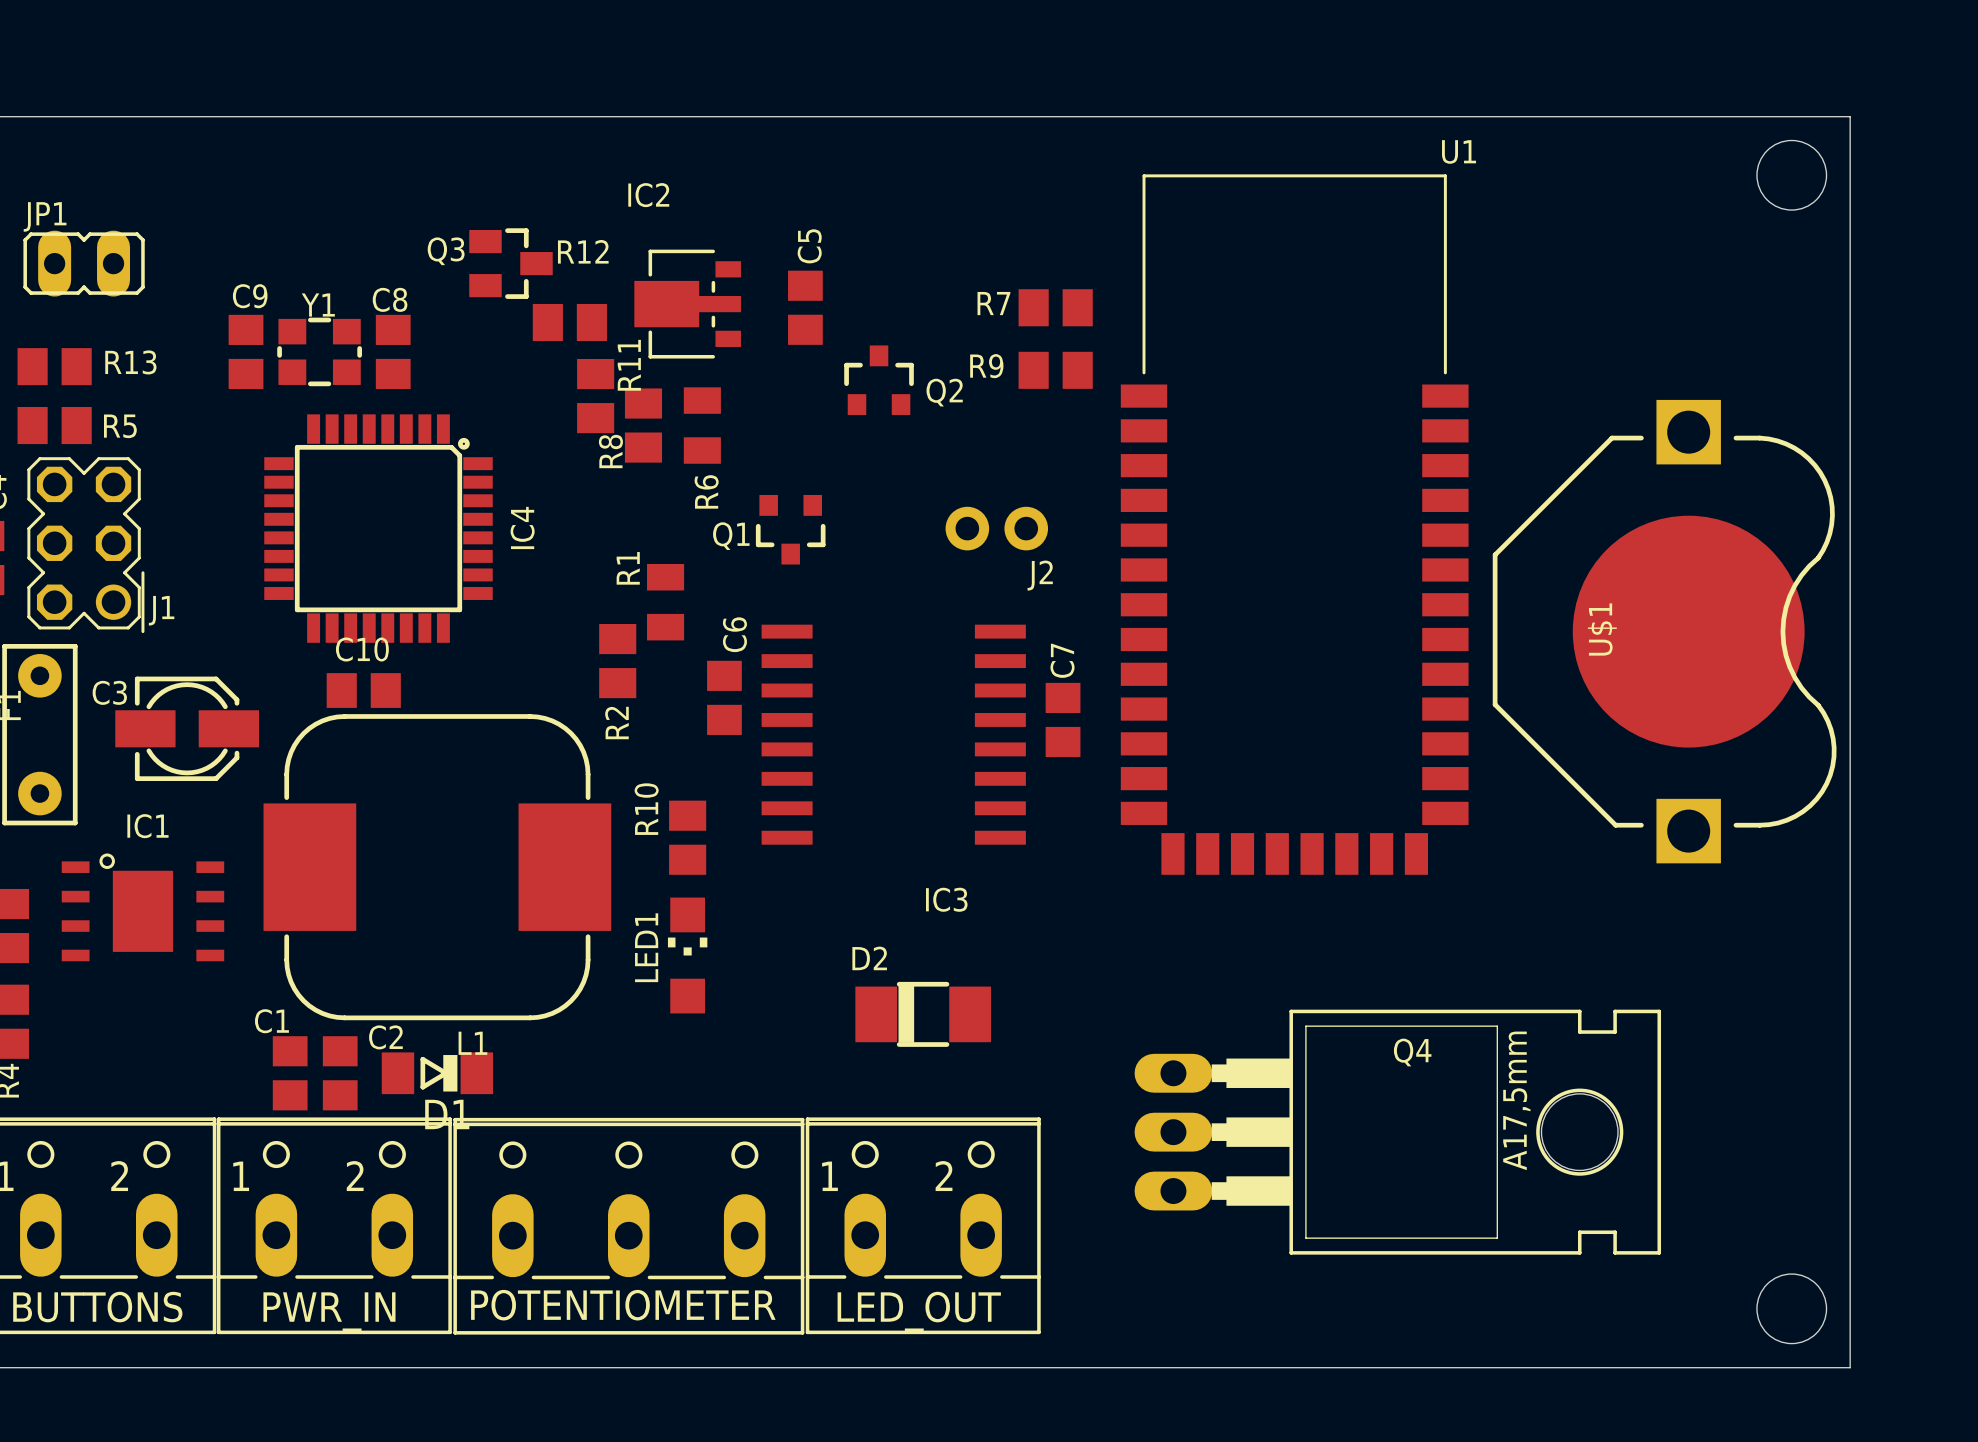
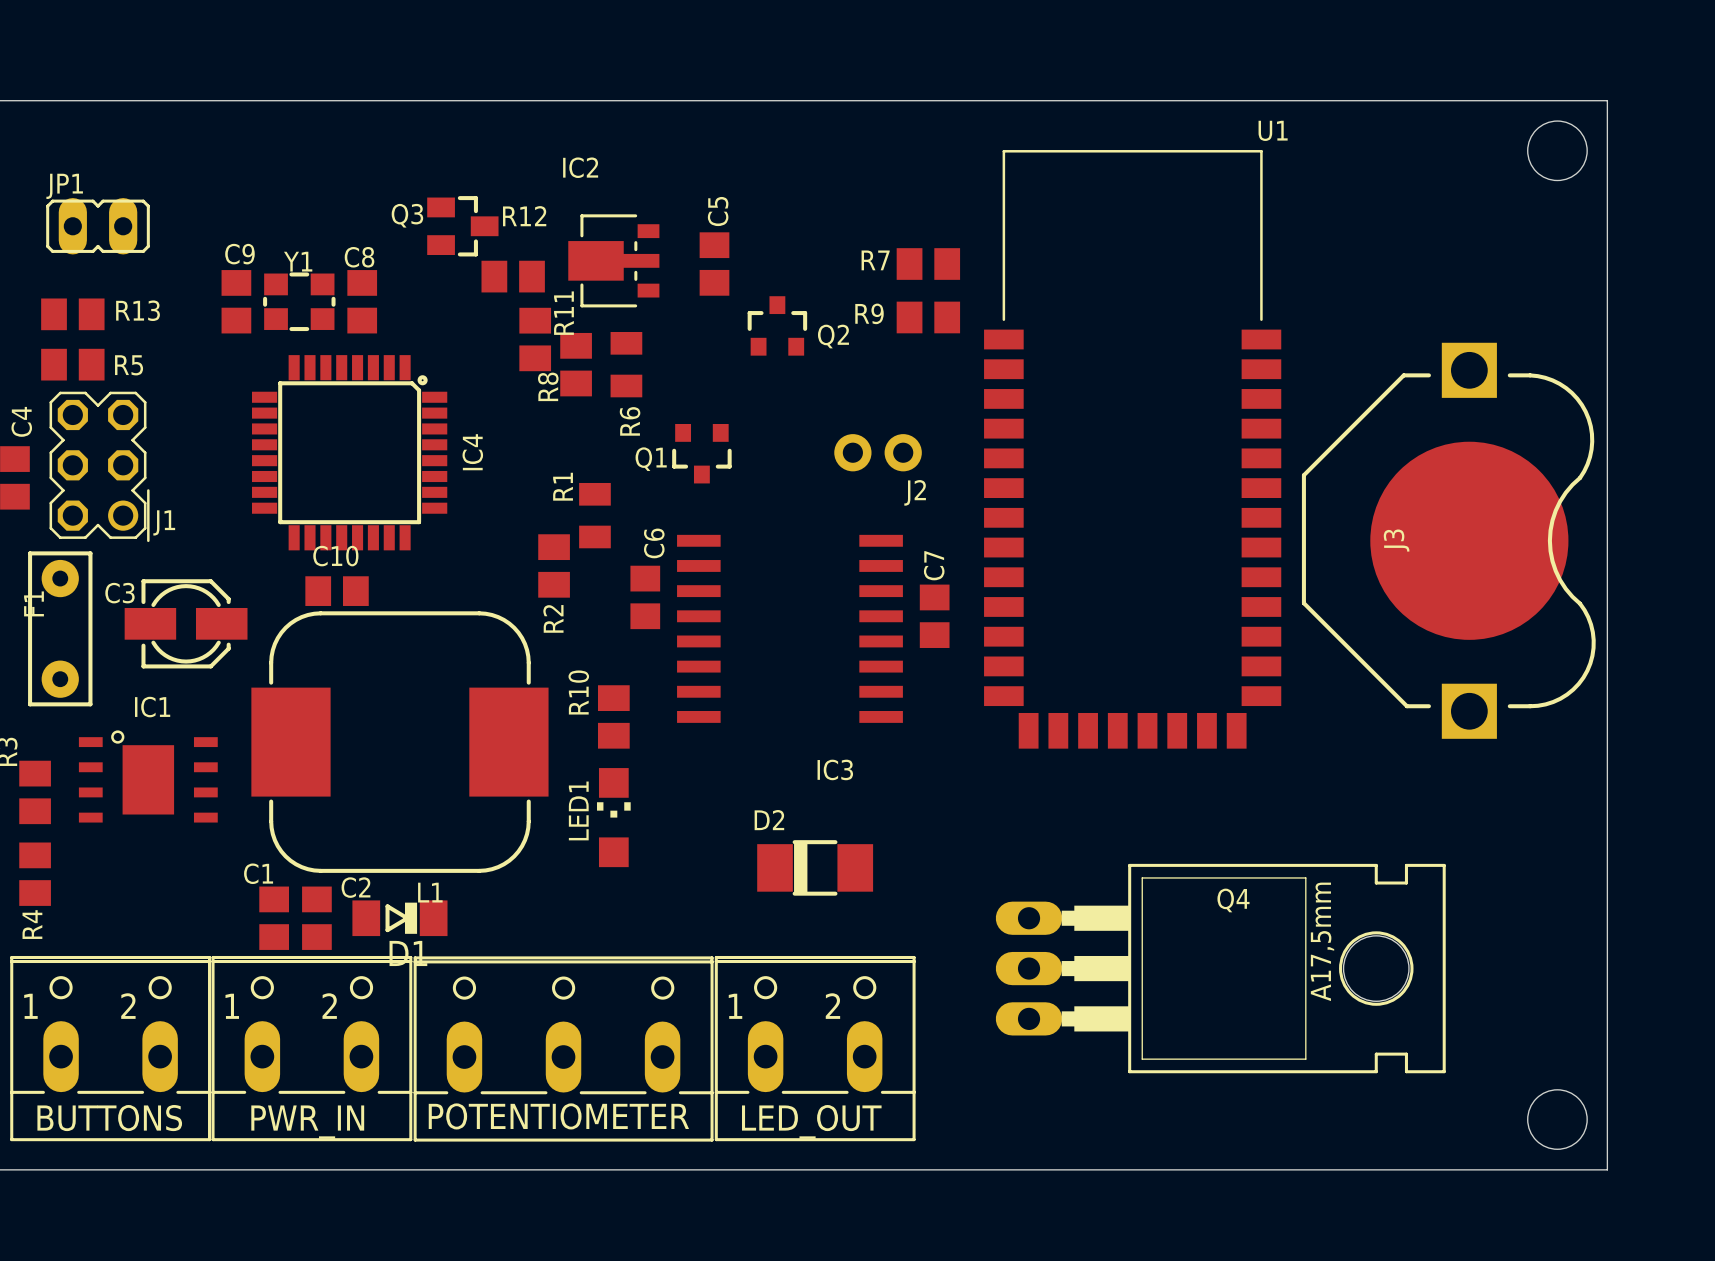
U$1 name: U$1 (1602, 629) -> J3 (1396, 540)

